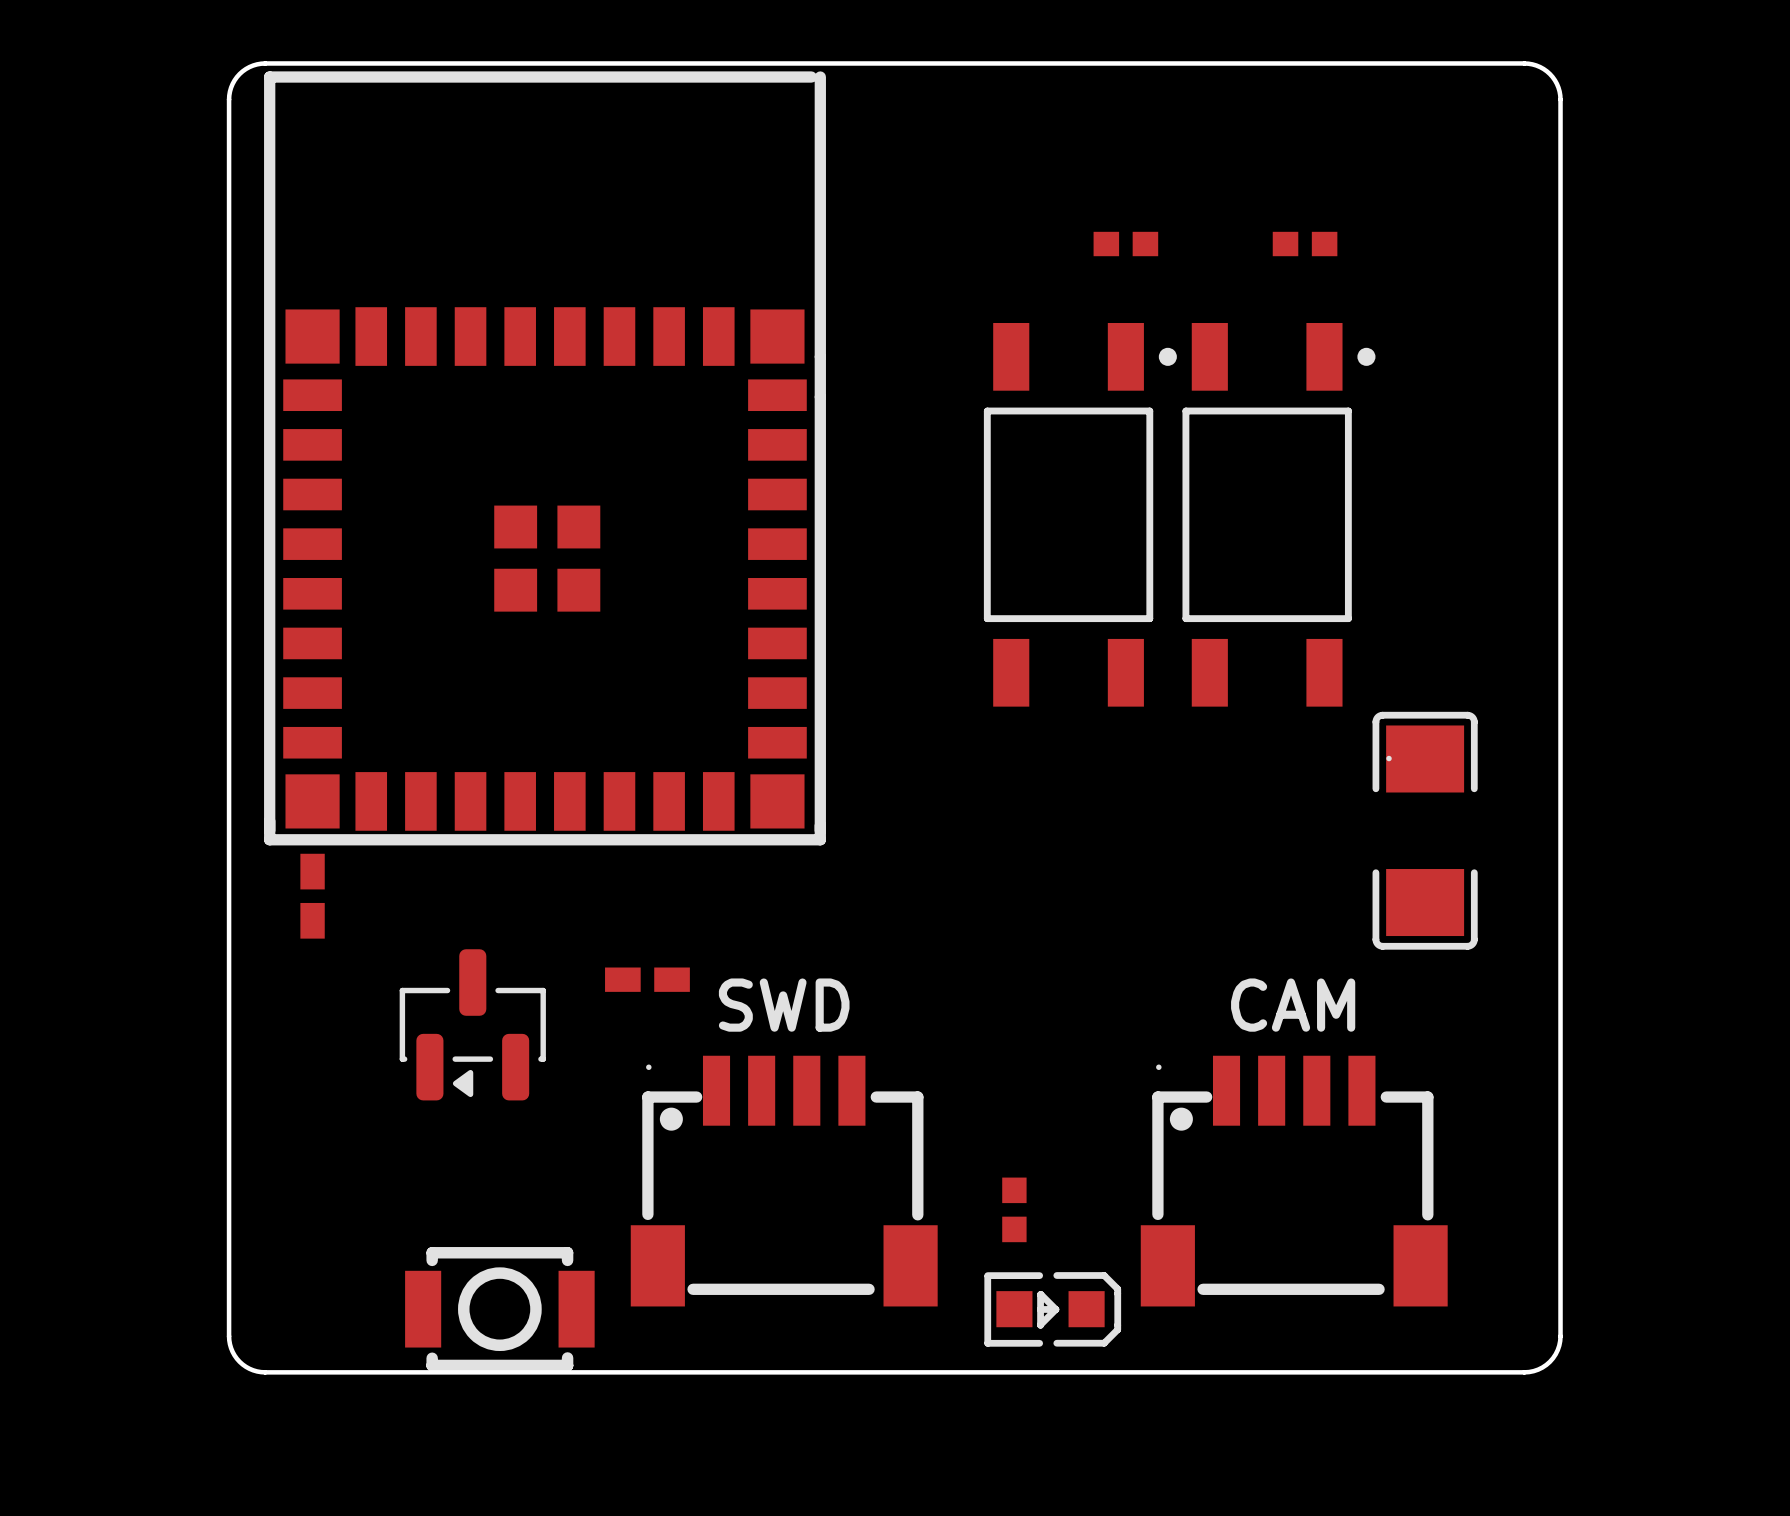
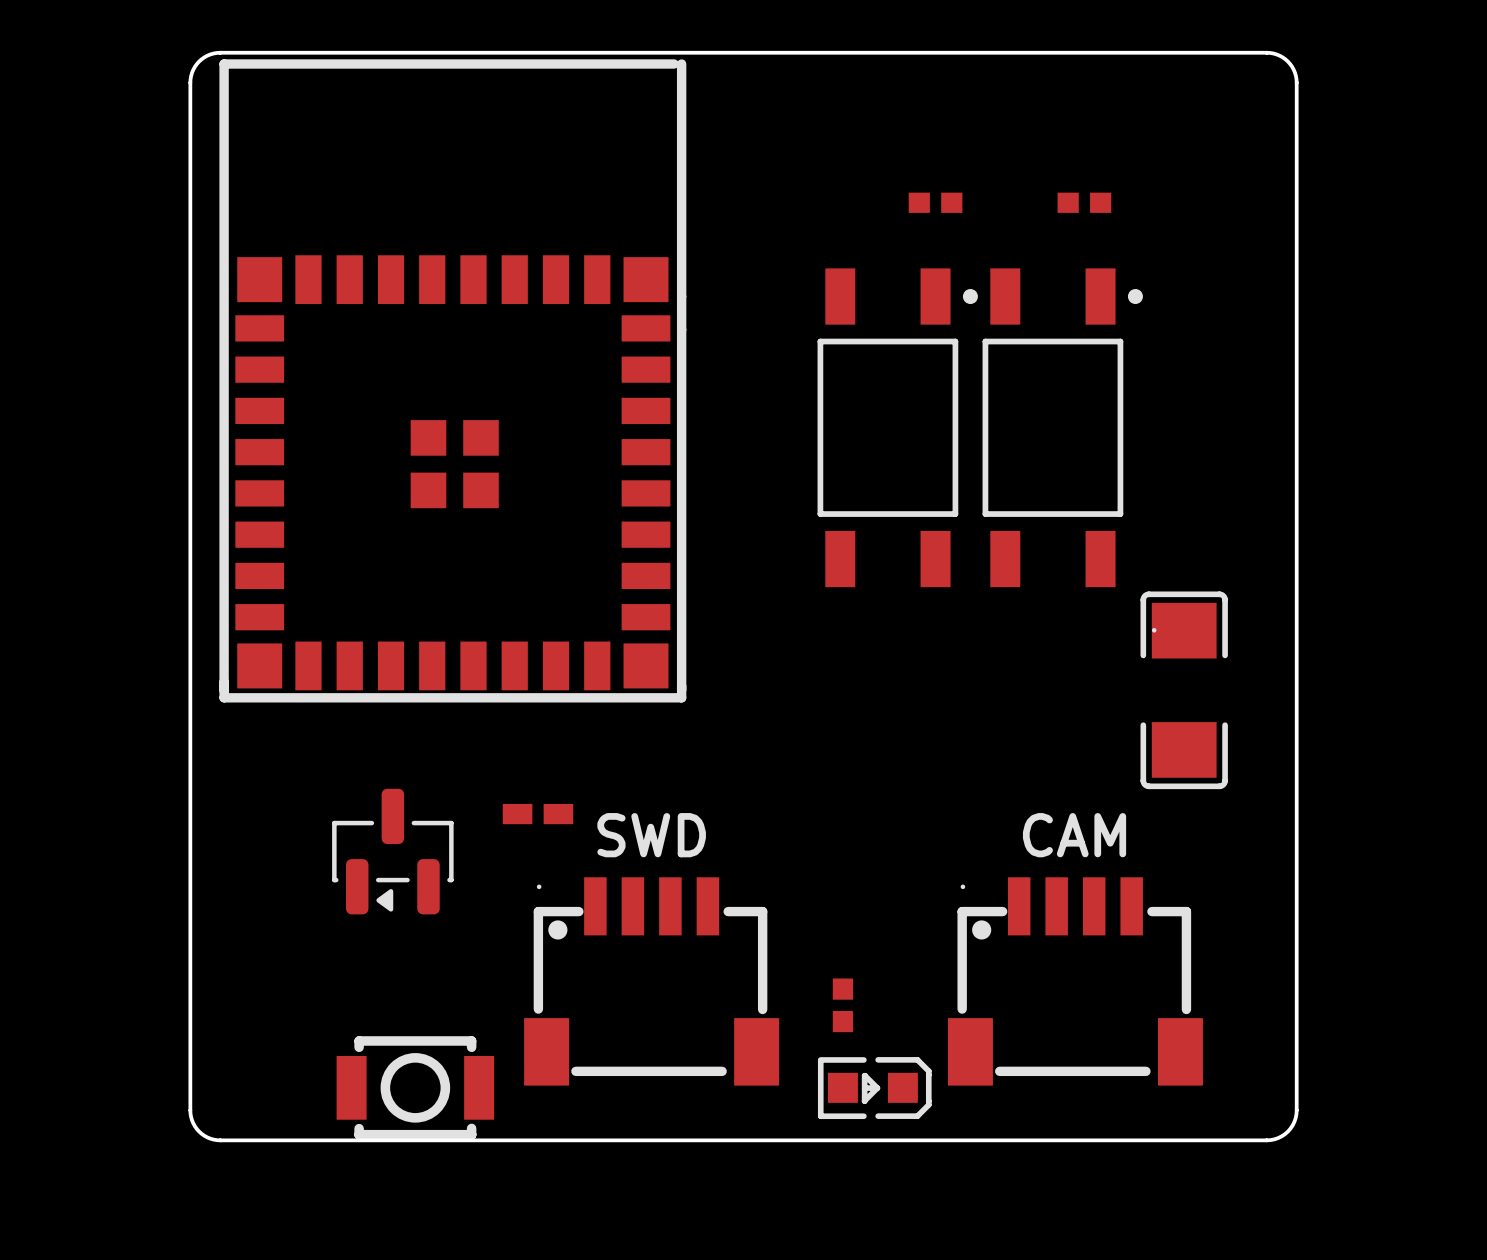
part: (312, 896) -> none

